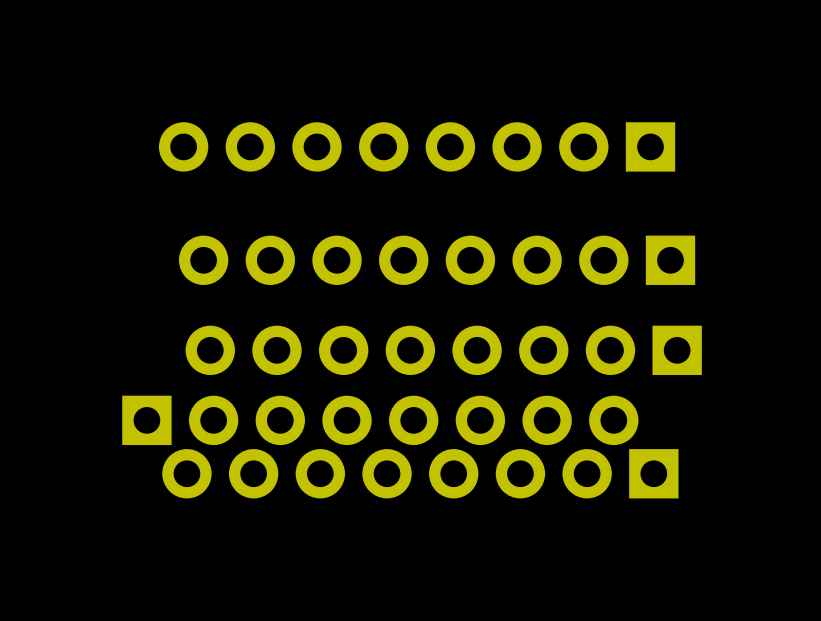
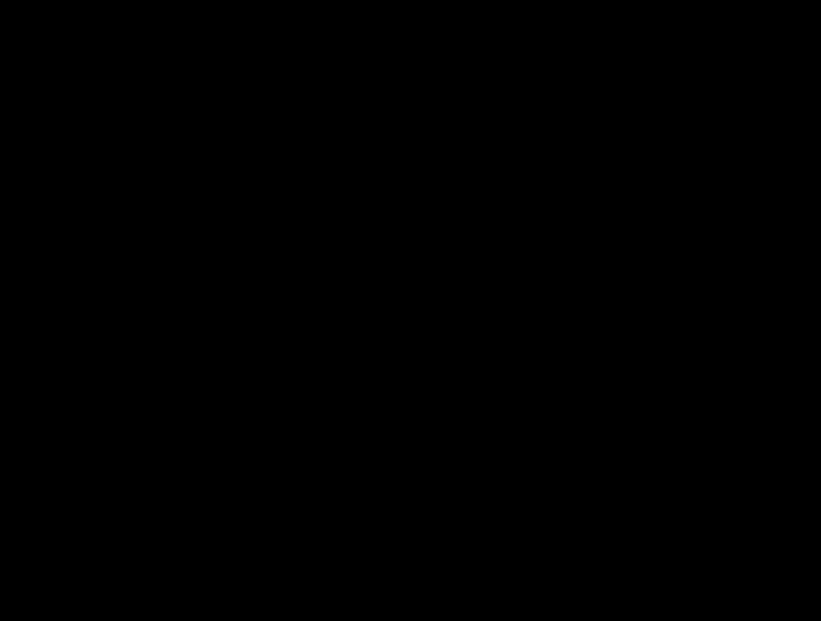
part: (417, 146) -> none
part: (437, 260) -> none
part: (443, 350) -> none
part: (380, 420) -> none
part: (420, 473) -> none

